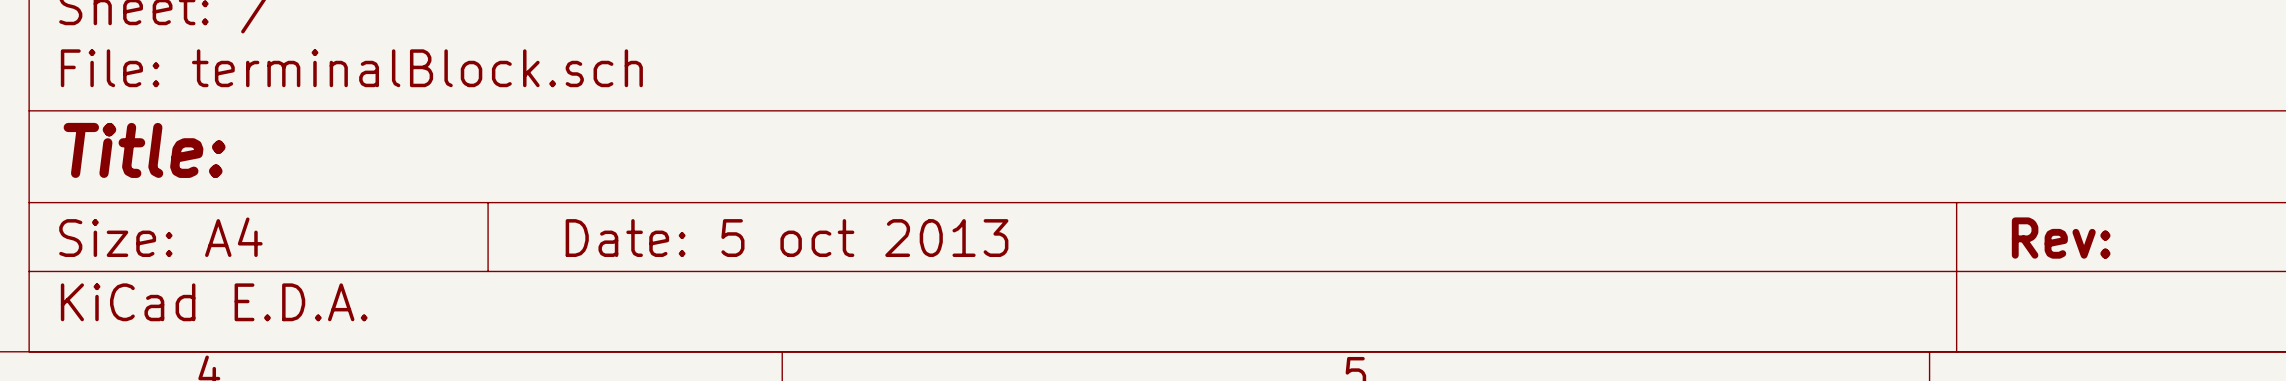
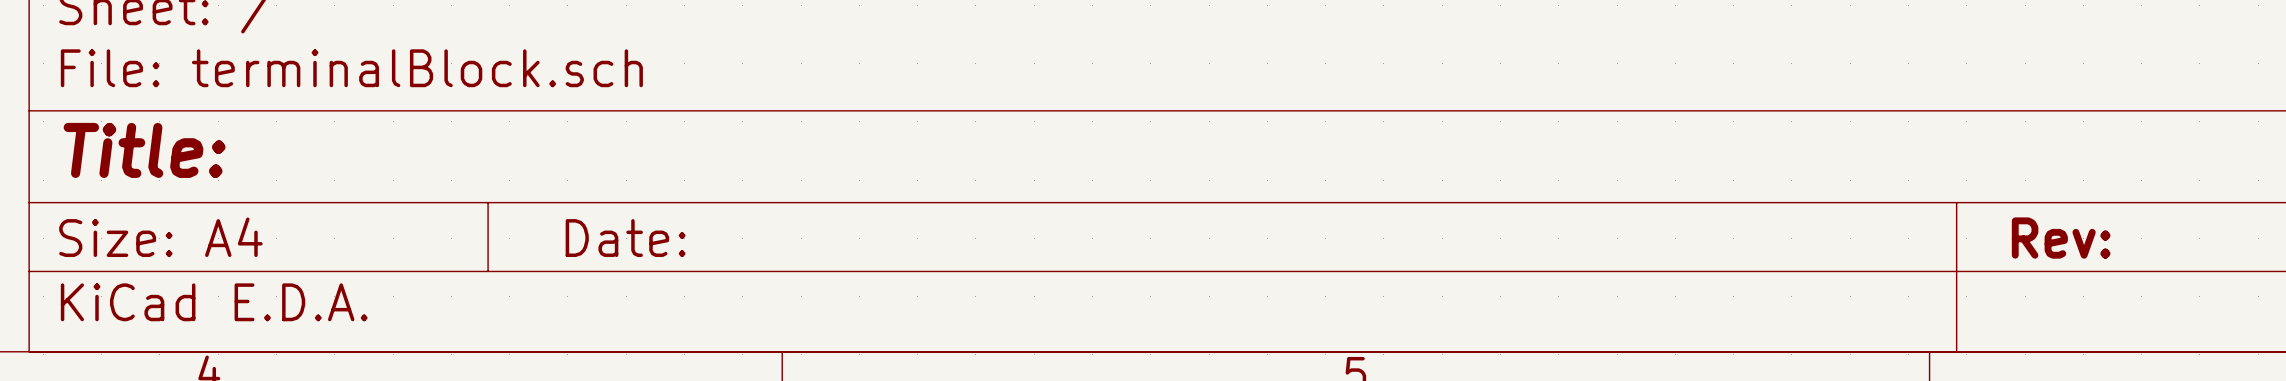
title block: Date: 5 oct 2013 (787, 238) -> Date: (625, 238)

